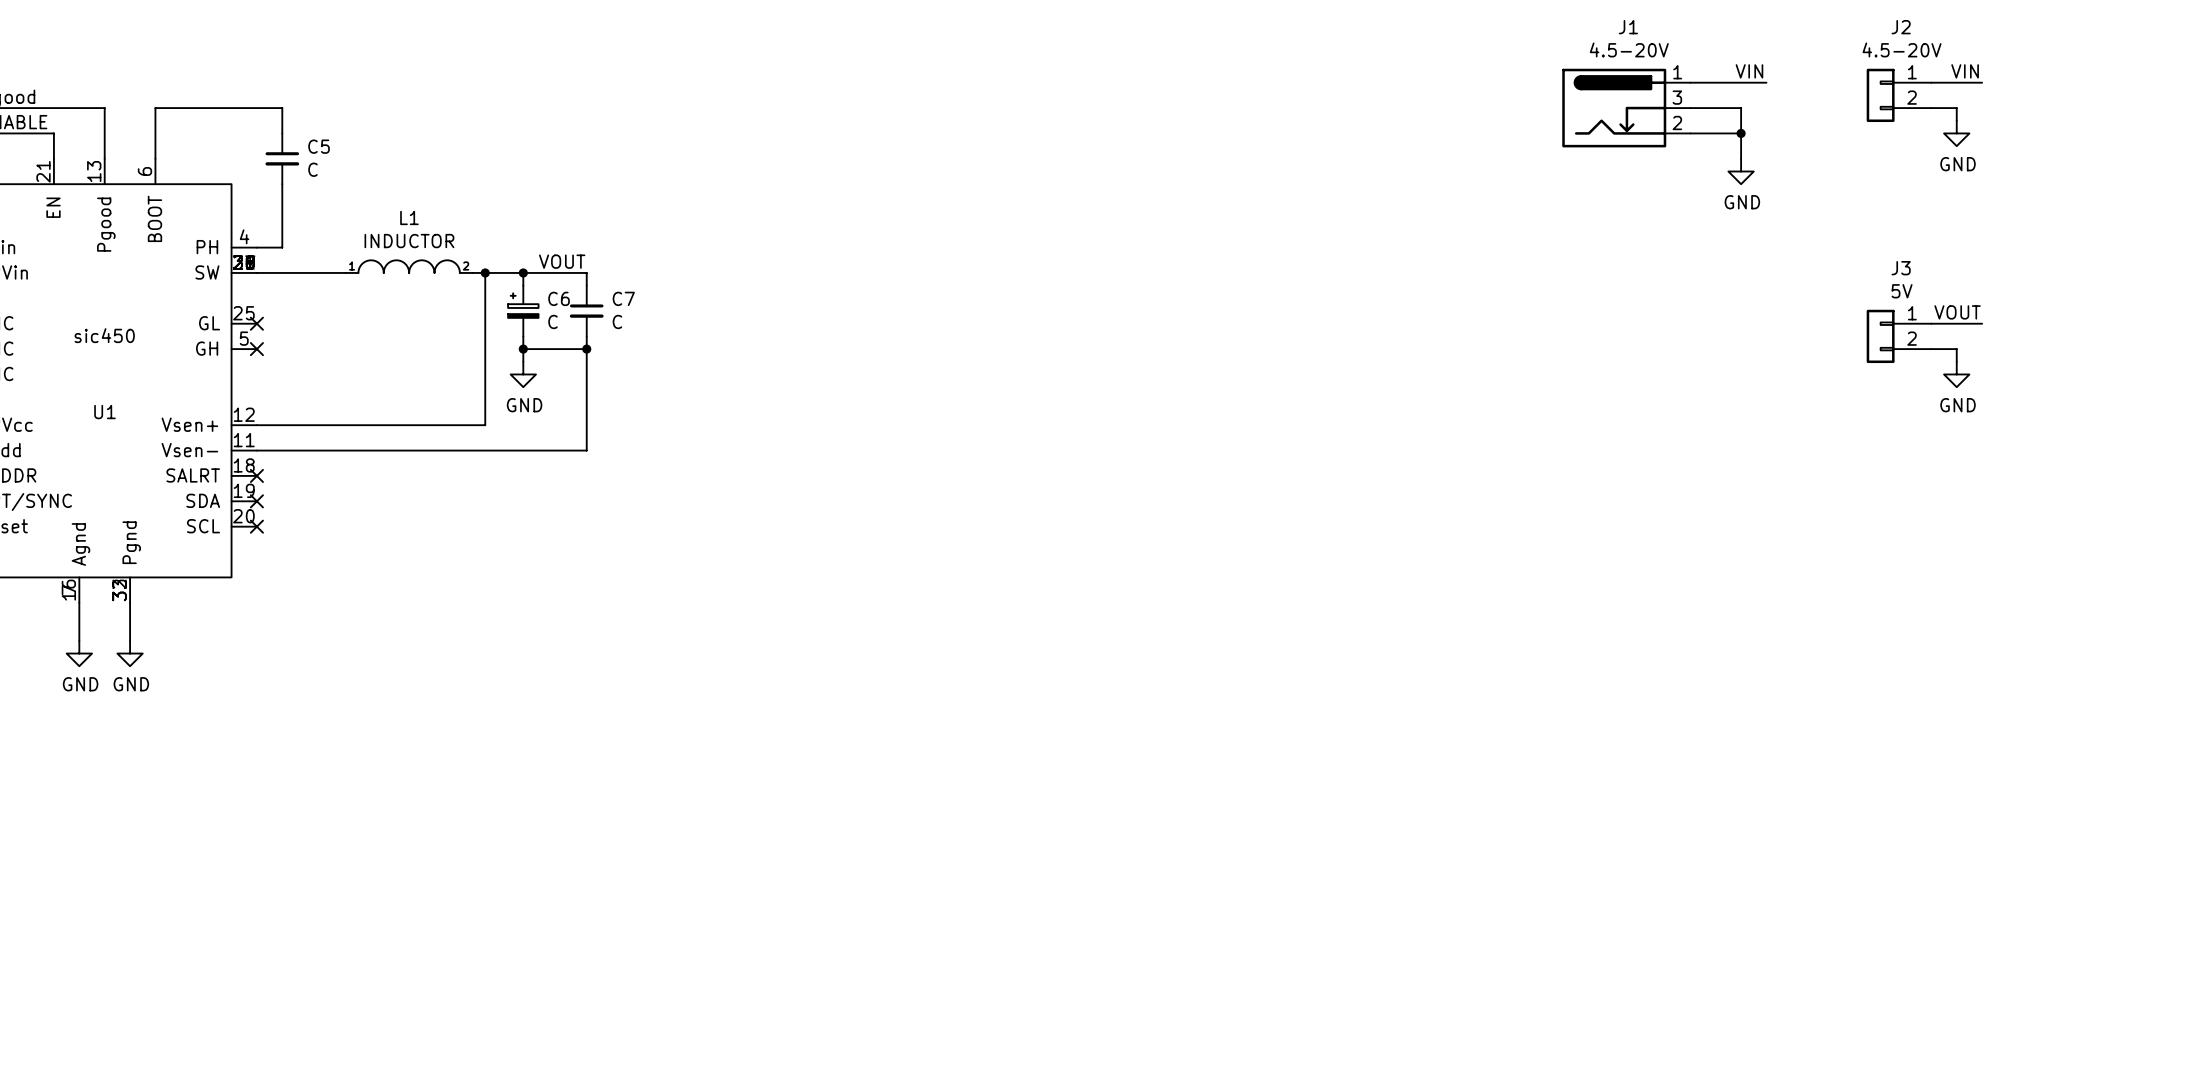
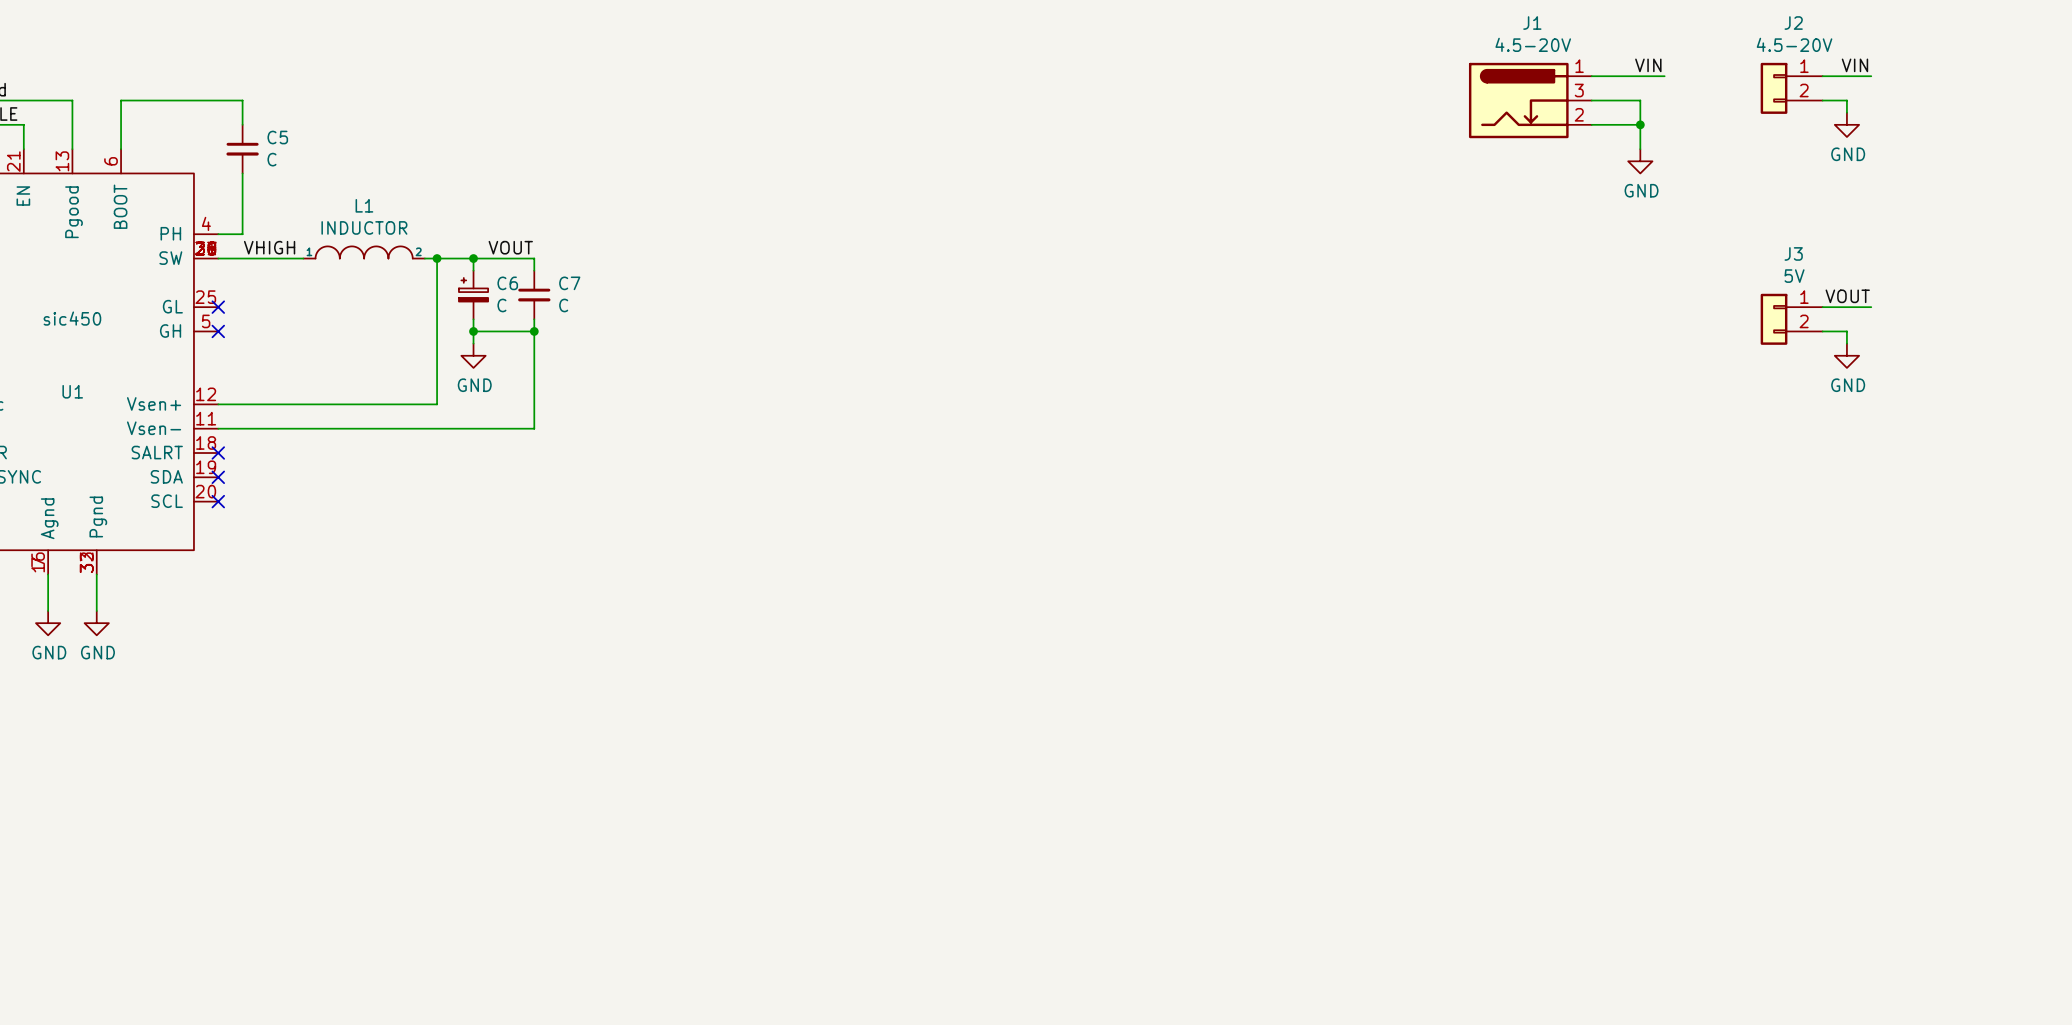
label: none -> VHIGH (269, 247)

